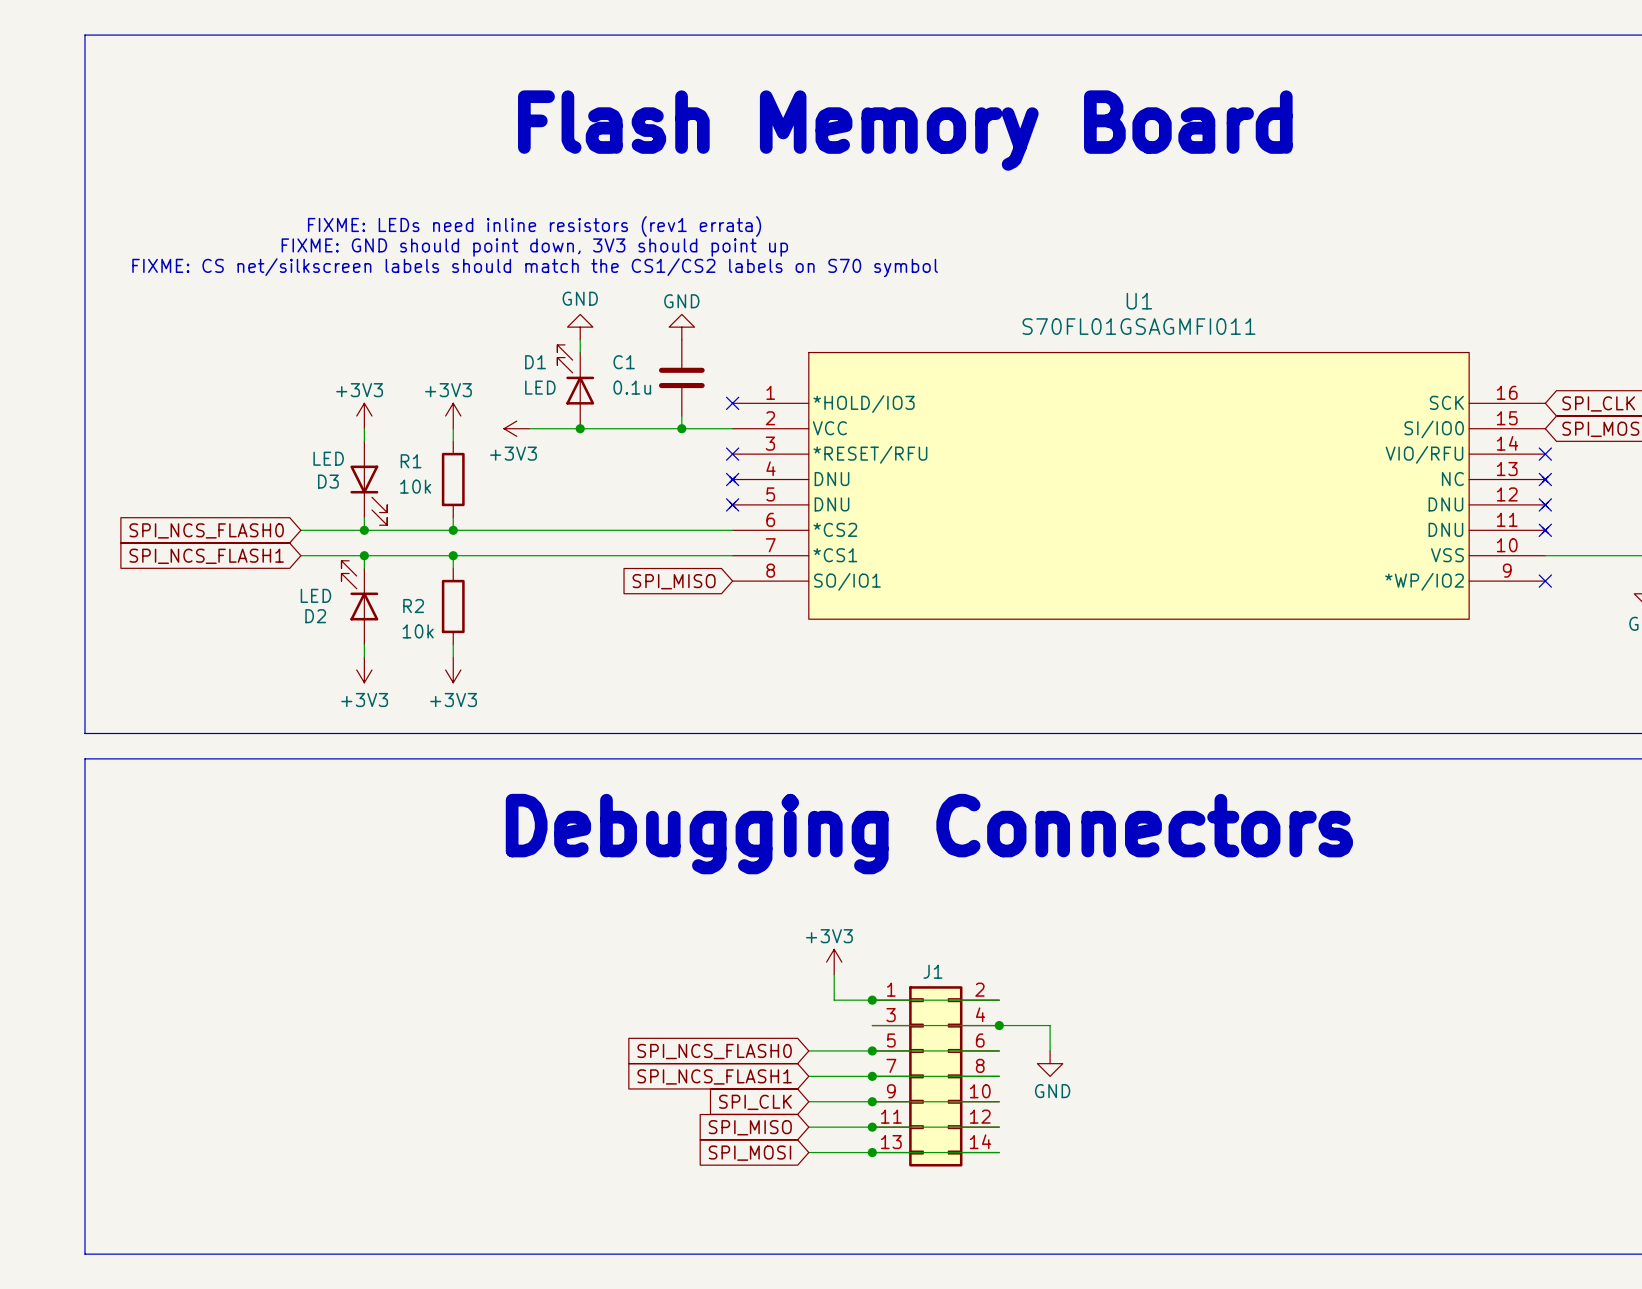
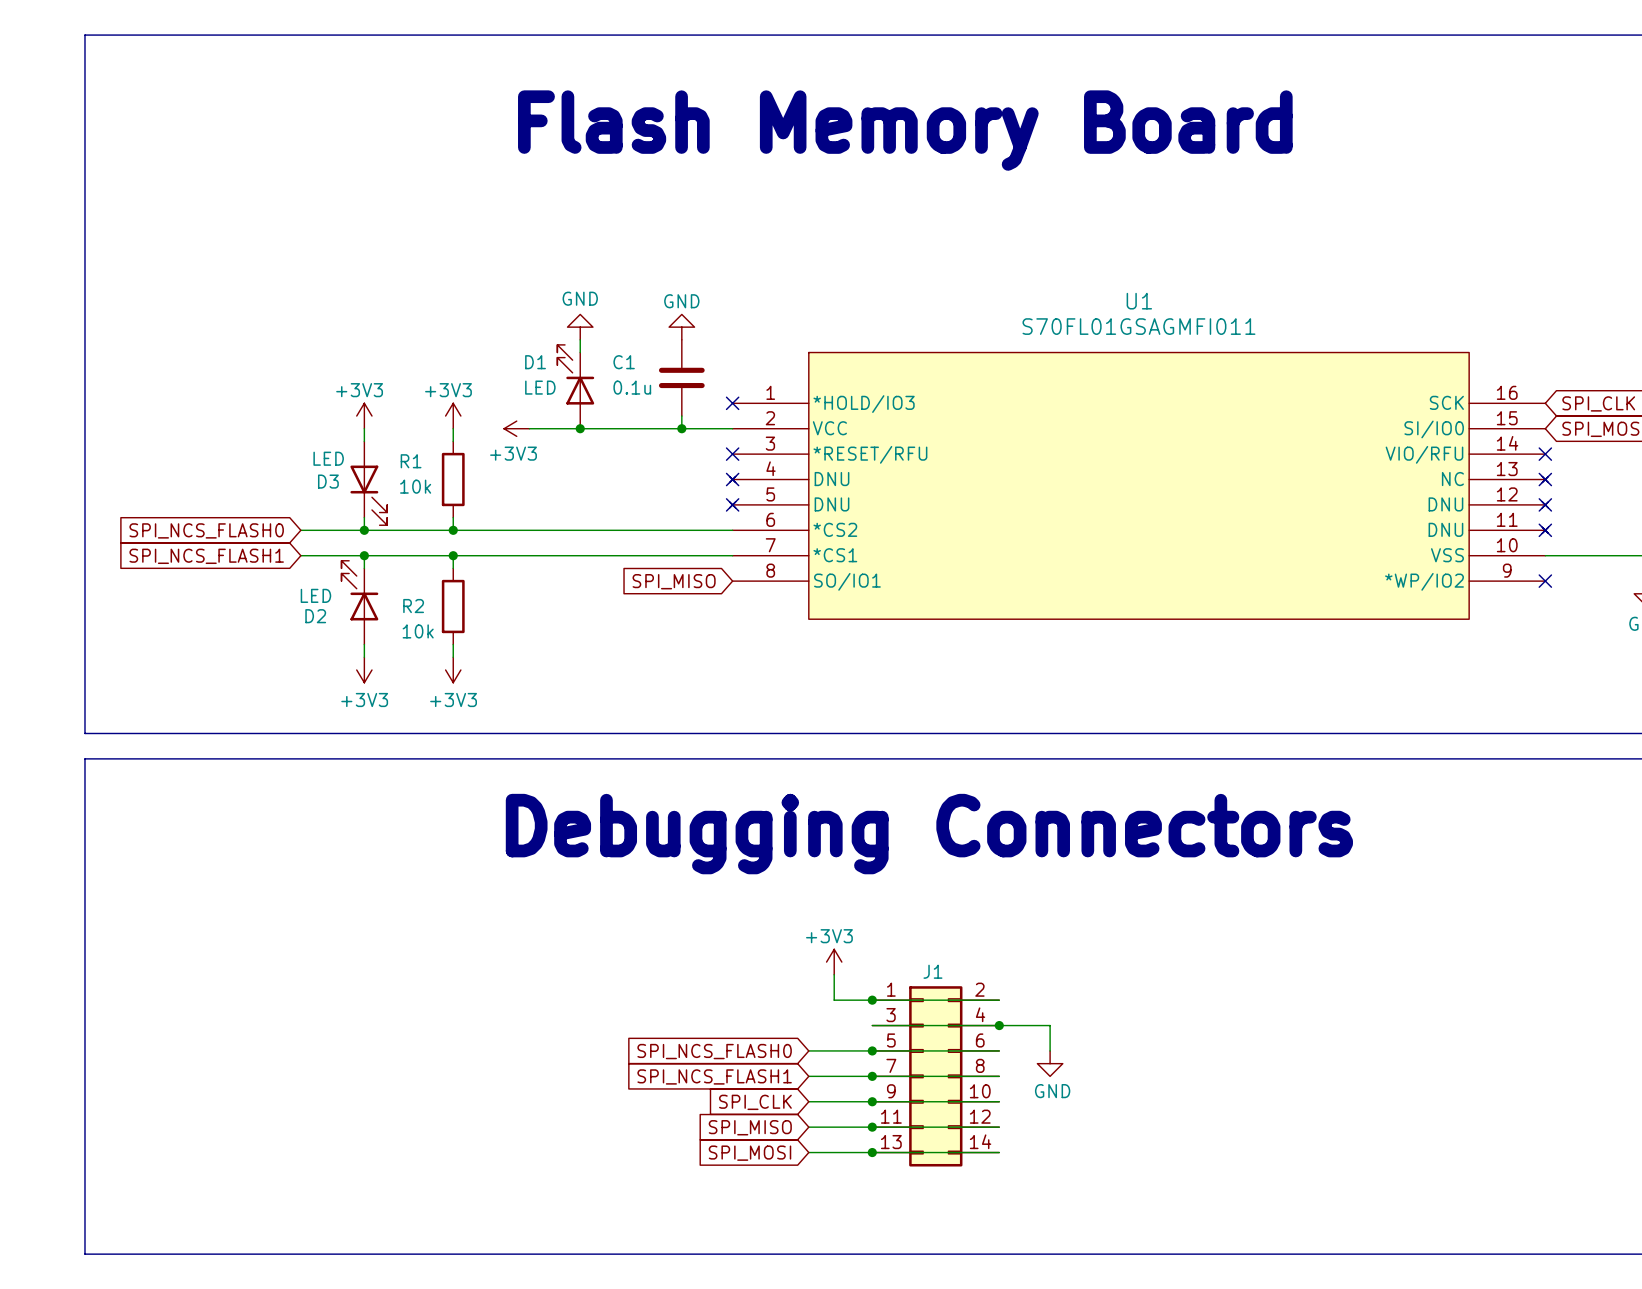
text: FIXME: LEDs need inline resistors (rev1 errata) (534, 226) -> none
text: FIXME: GND should point down, 3V3 should point up (534, 247) -> none
text: FIXME: CS net/silkscreen labels should match the CS1/CS2 labels on S70 symbol (535, 267) -> none

